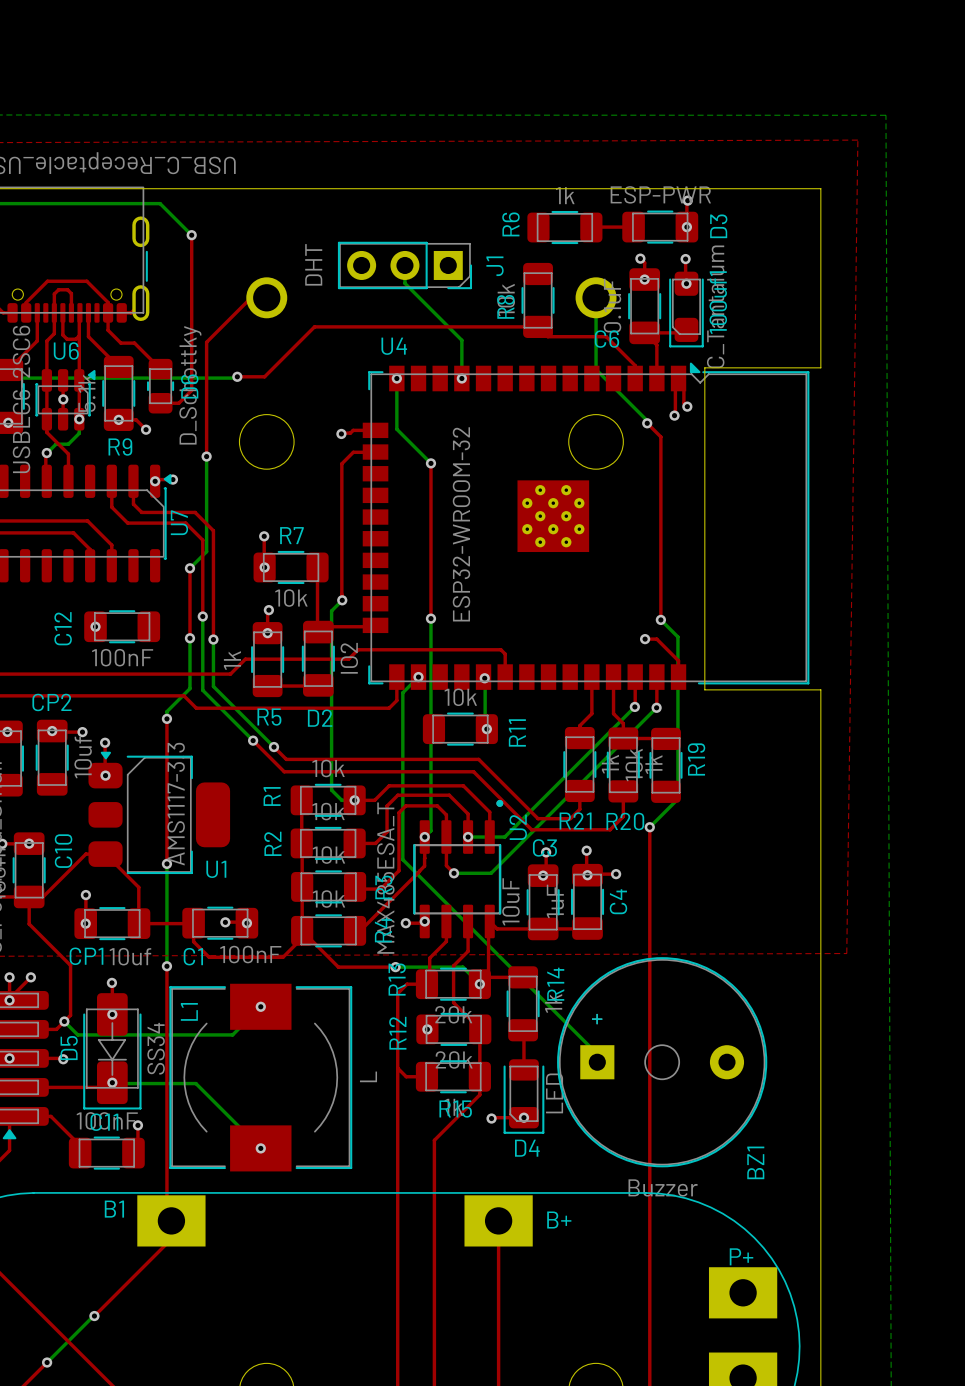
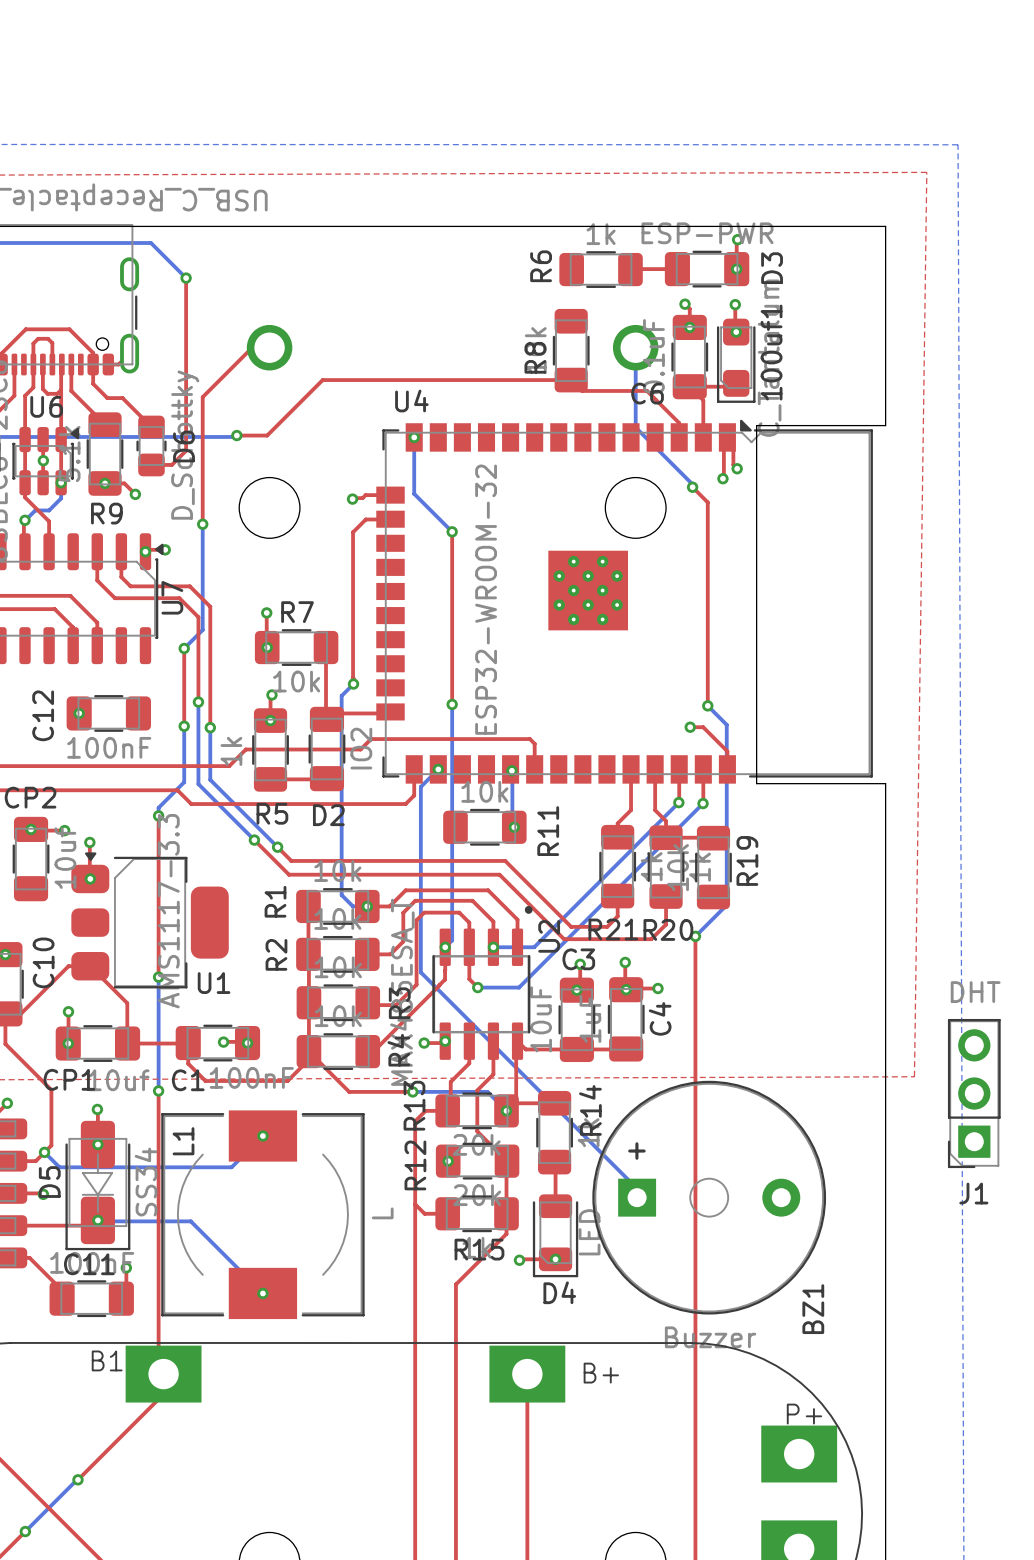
bottom track: (404, 265) (404, 283) (461, 340) (461, 378) -> none
J1 rotation: 0° (404, 265) -> 90° clockwise (974, 1093)
J1 position: (404, 265) -> (974, 1093)
via: (461, 378) -> none

